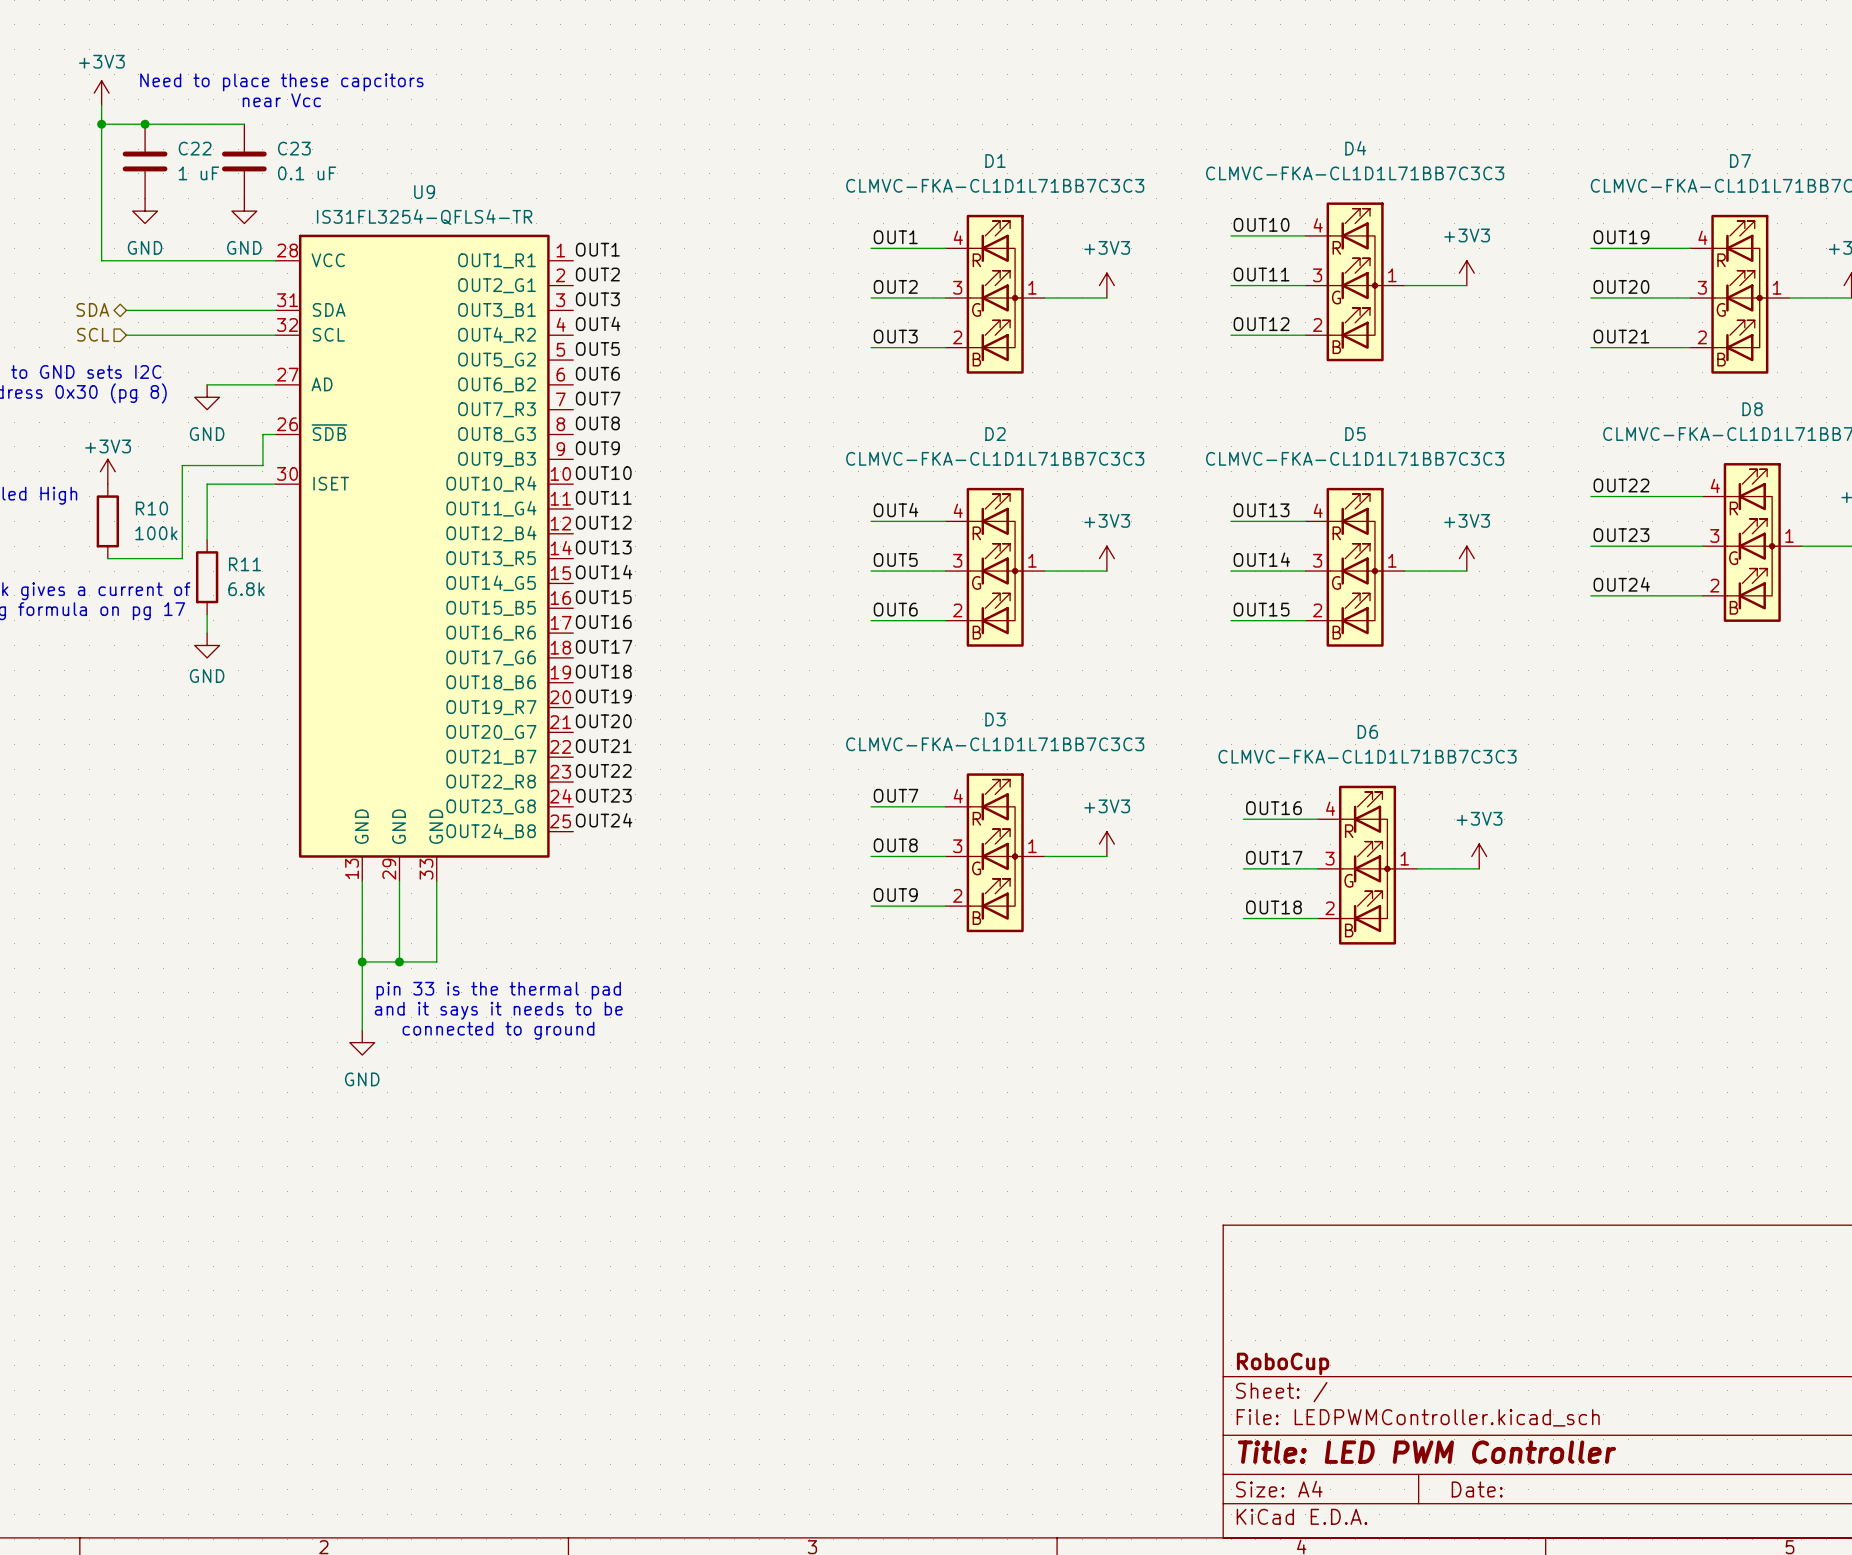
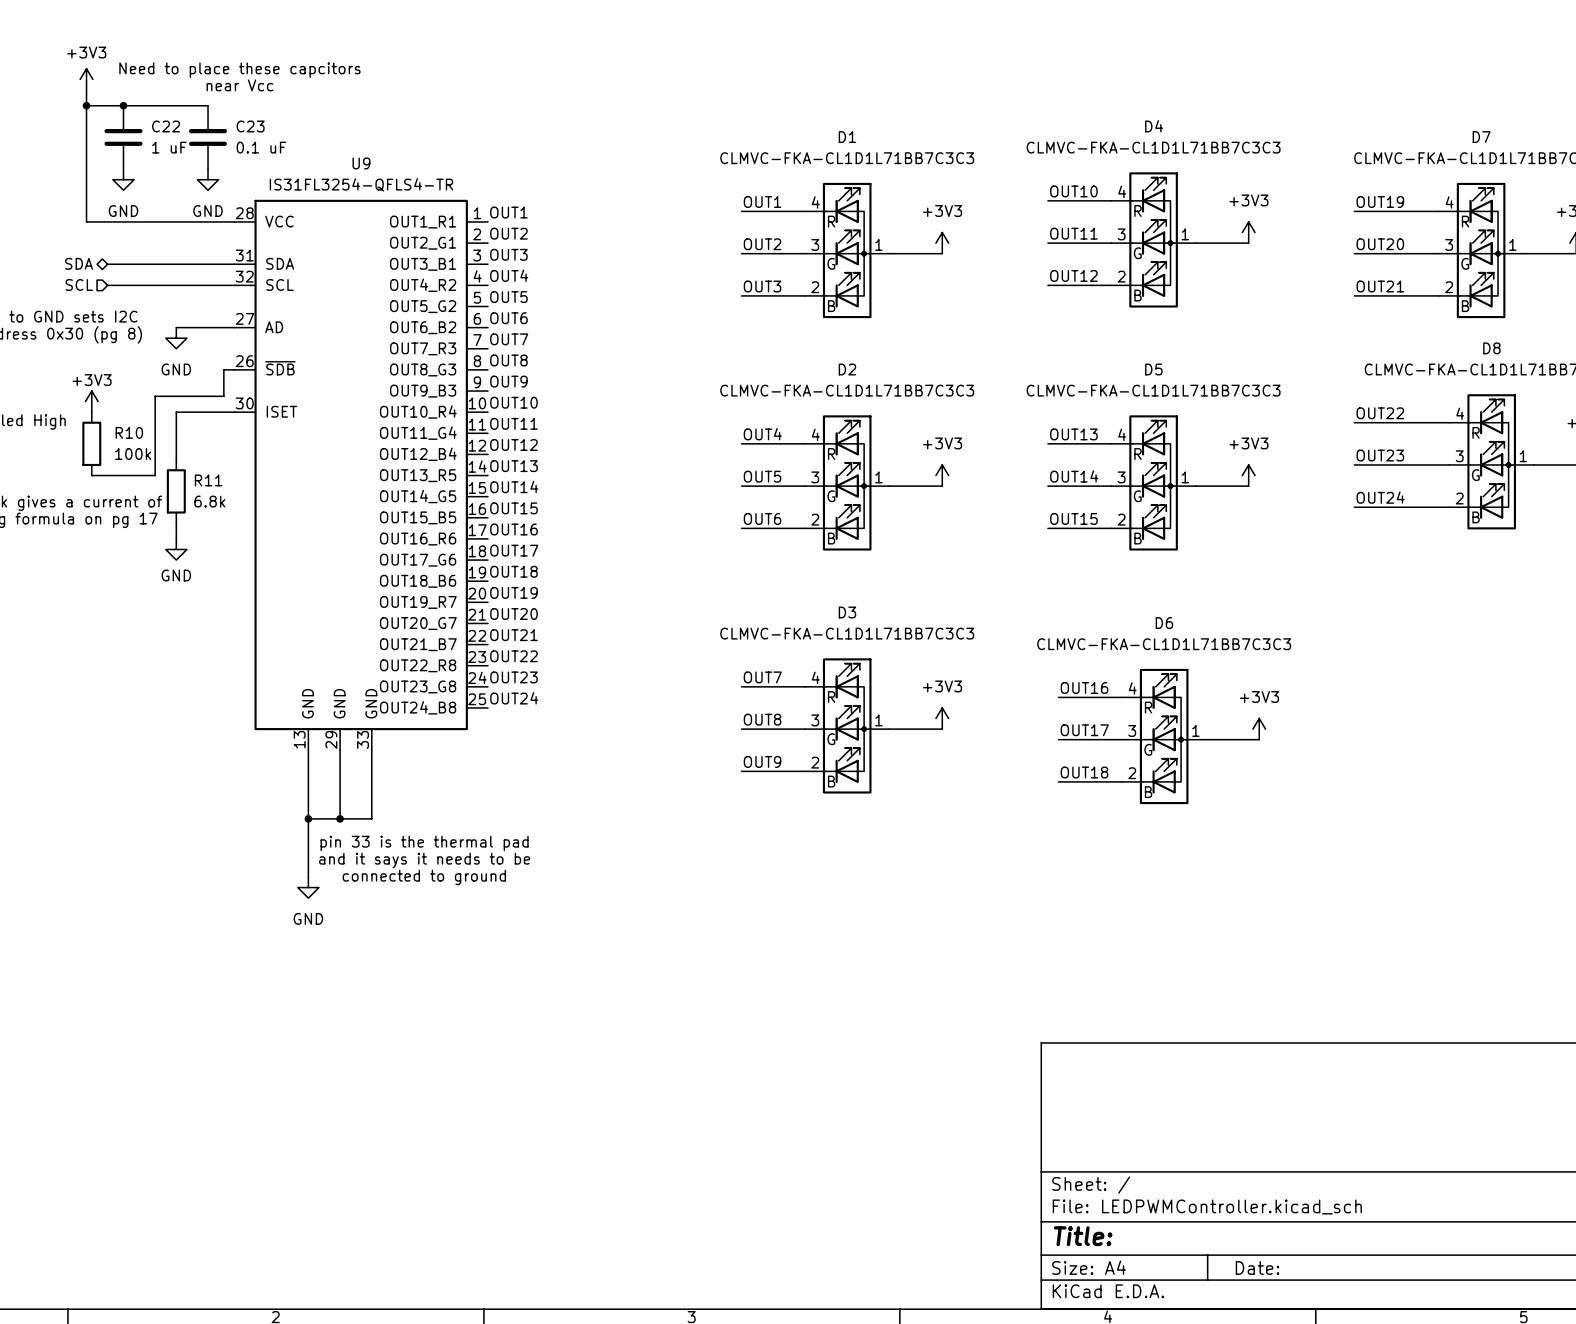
title block: RoboCup (1283, 1363) -> none
title block: Title: LED PWM Controller (1426, 1452) -> Title: (1083, 1236)

